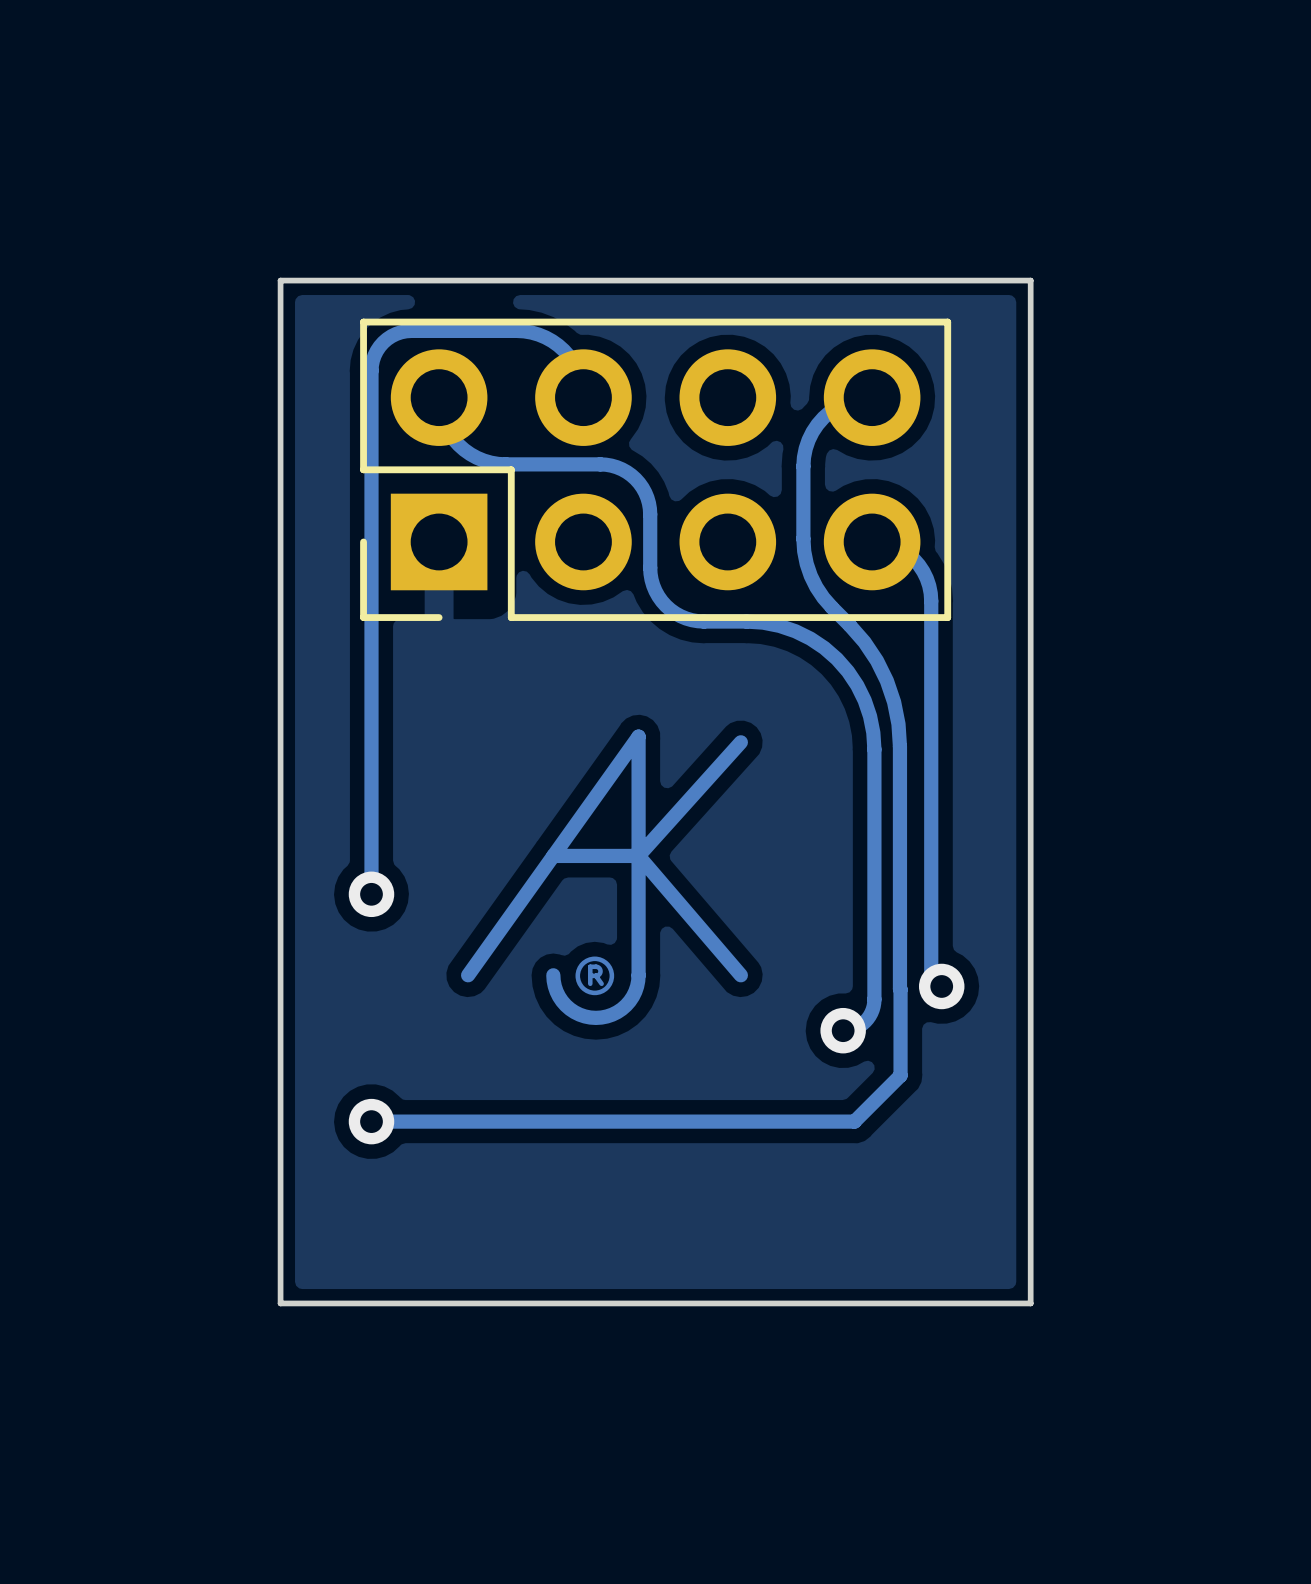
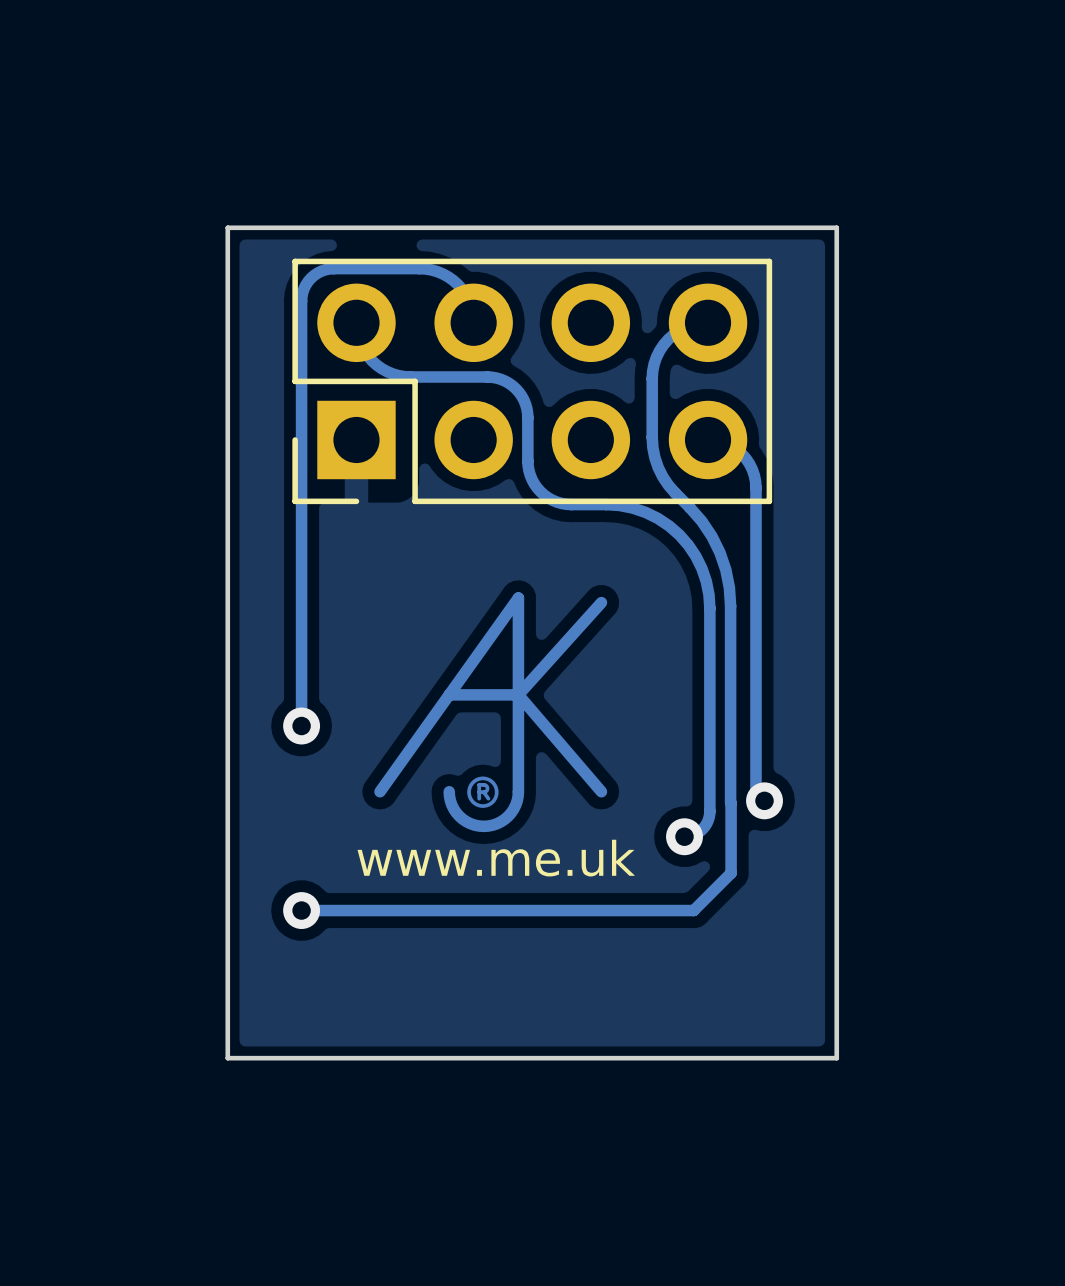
text: none -> www.me.uk (496, 858)

